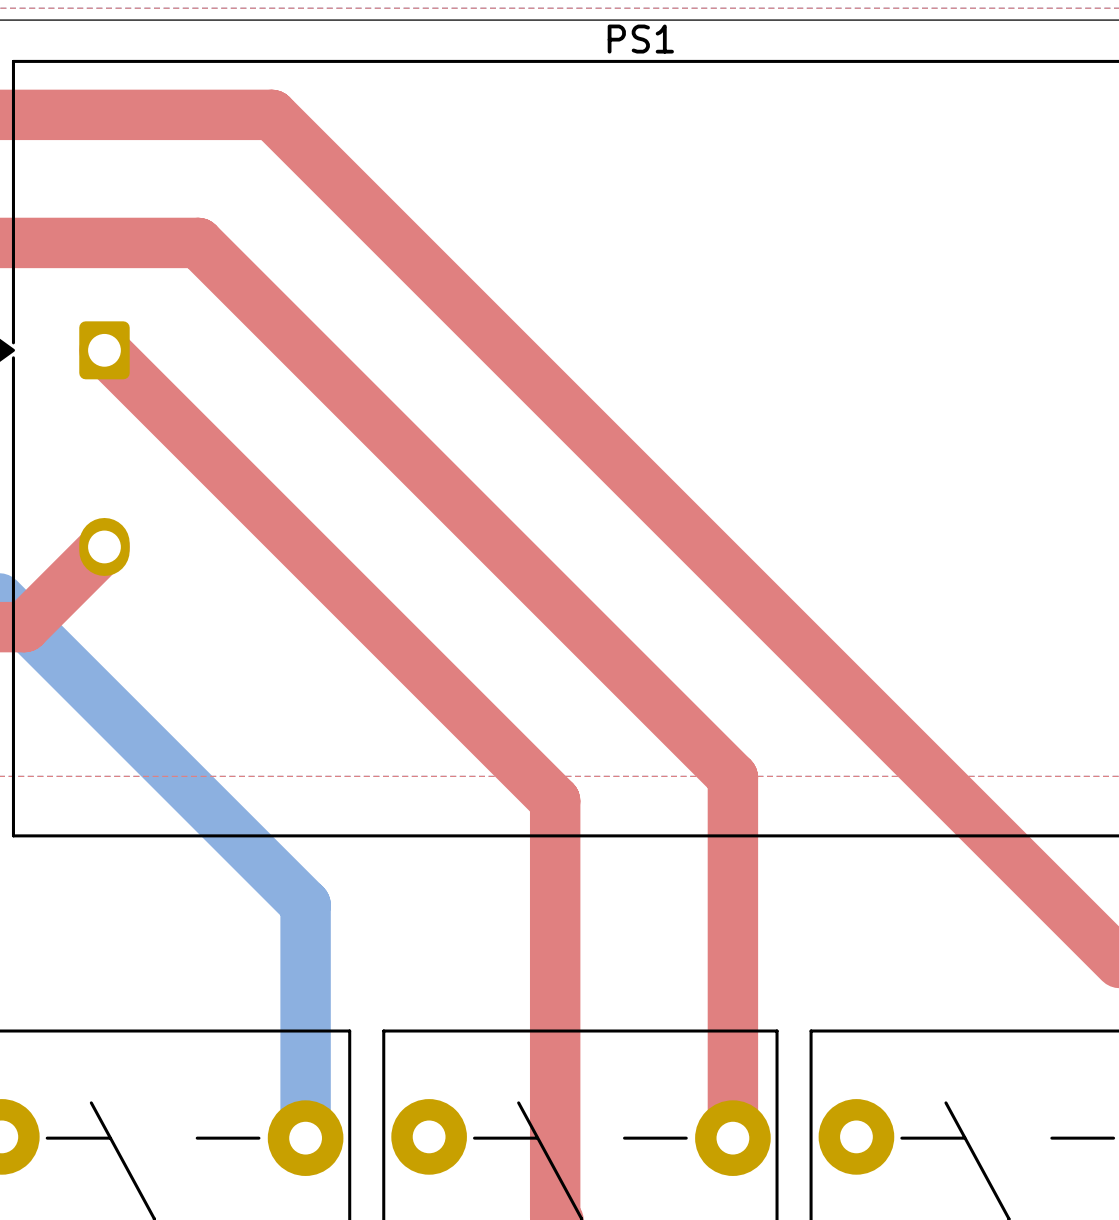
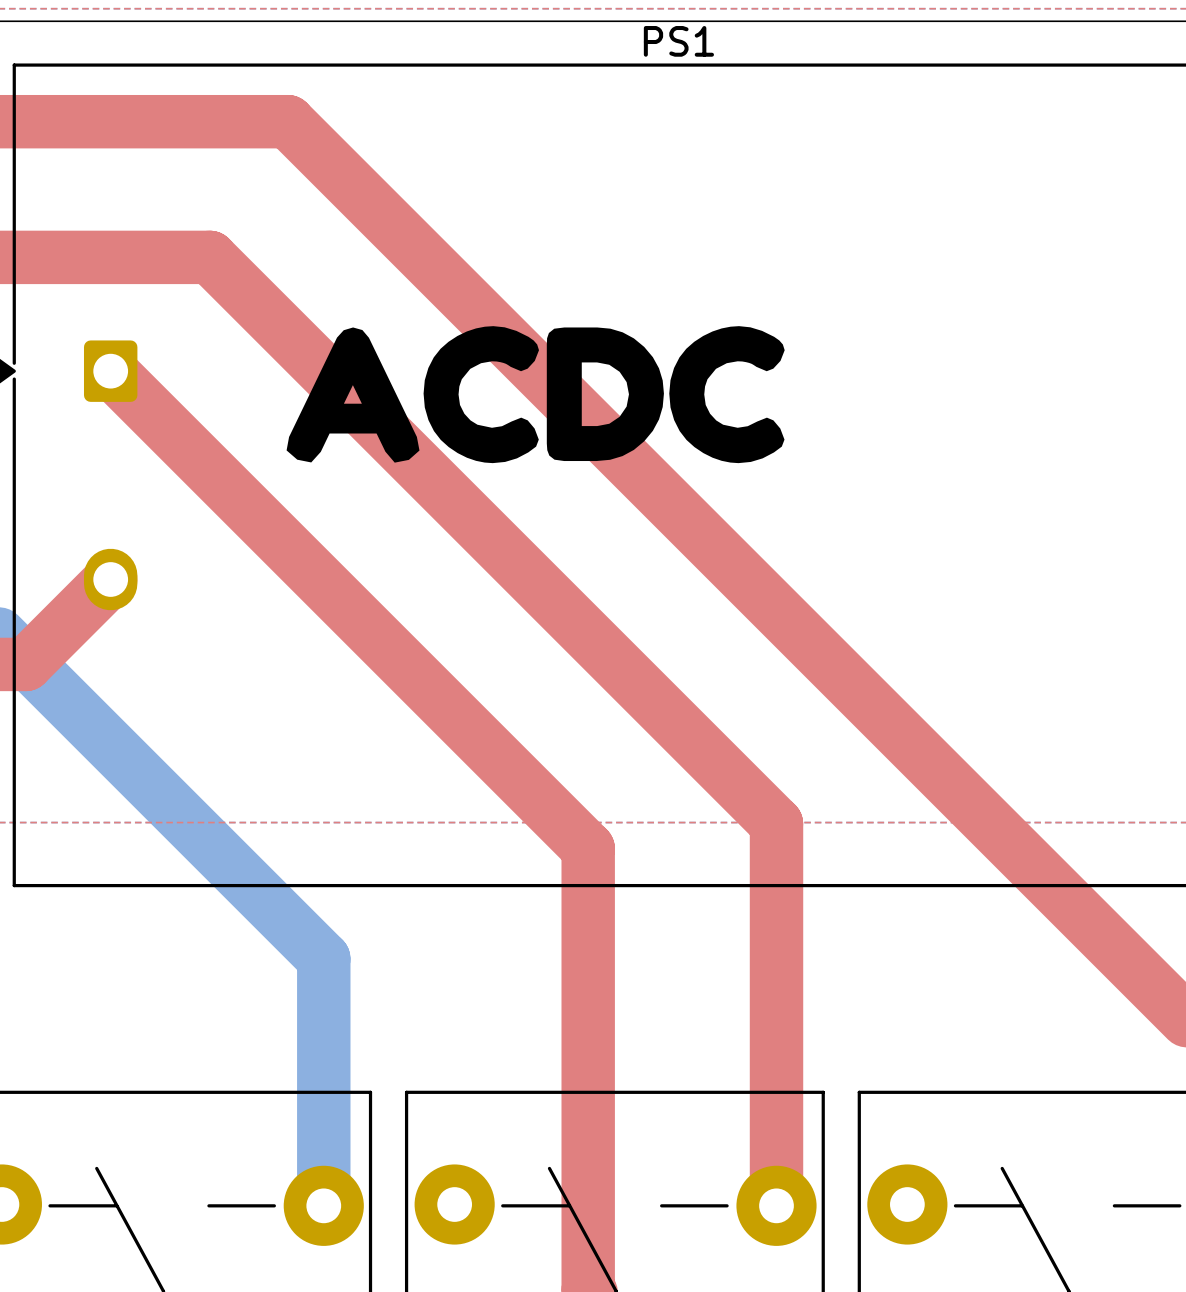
drawing: none -> [286, 326, 785, 464]

